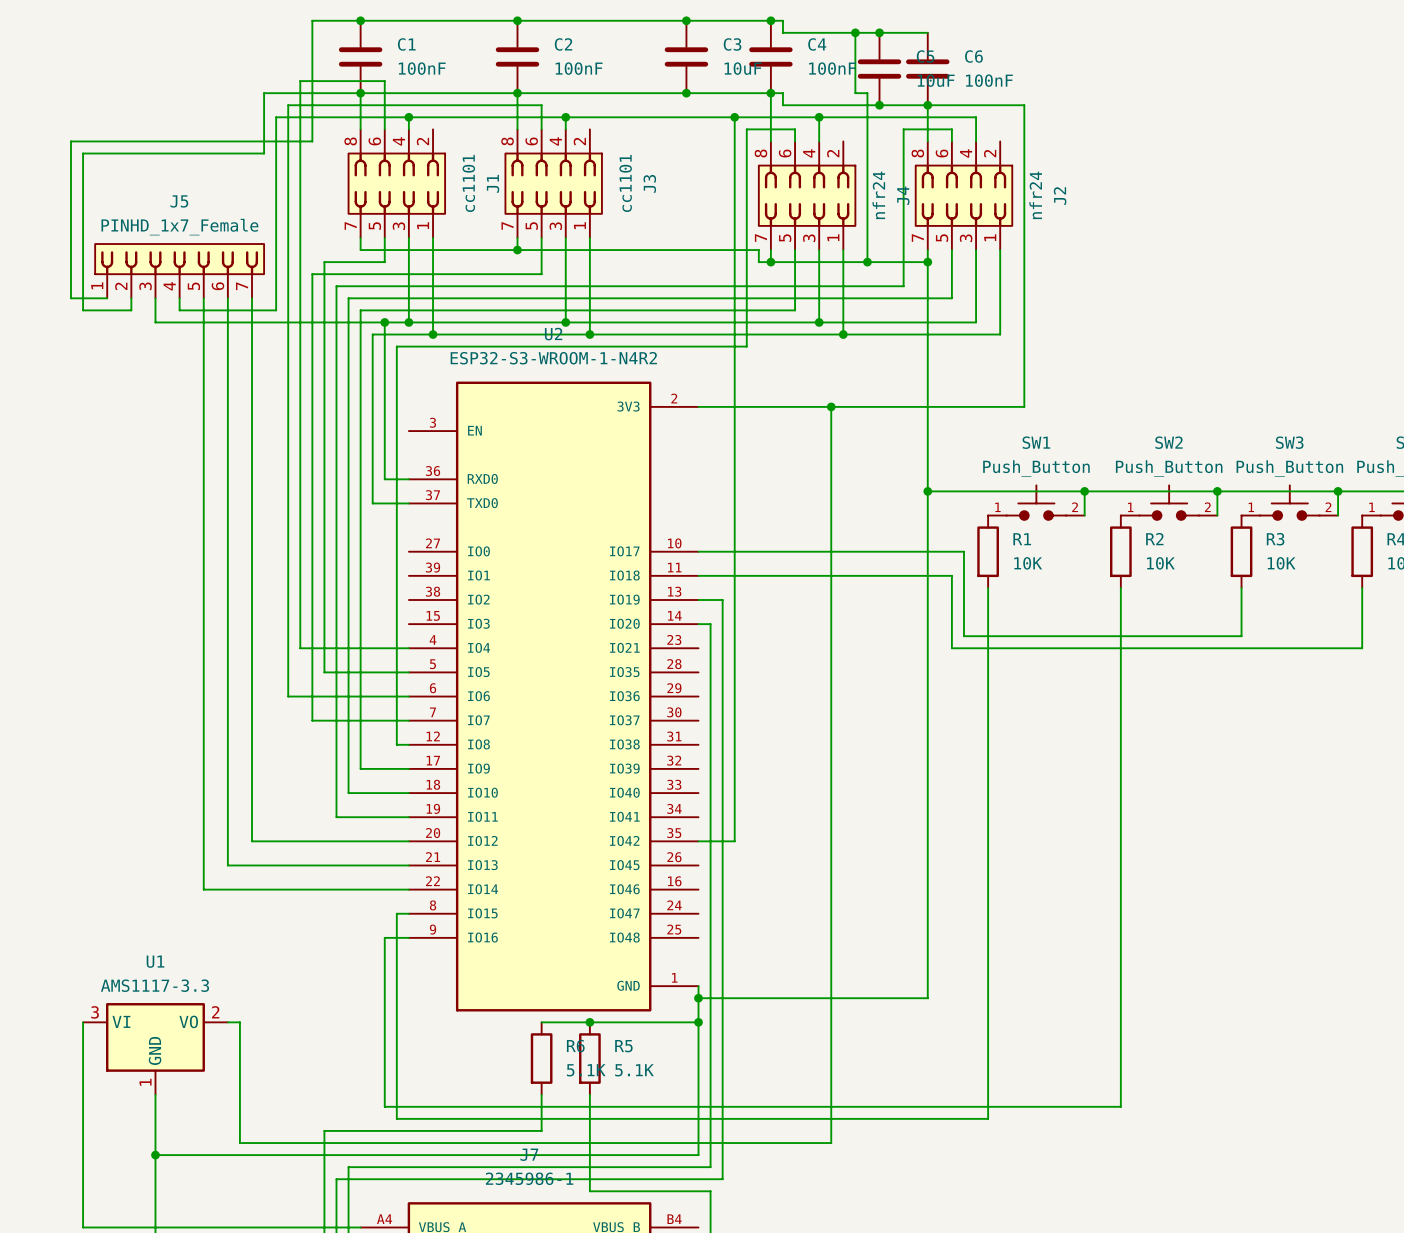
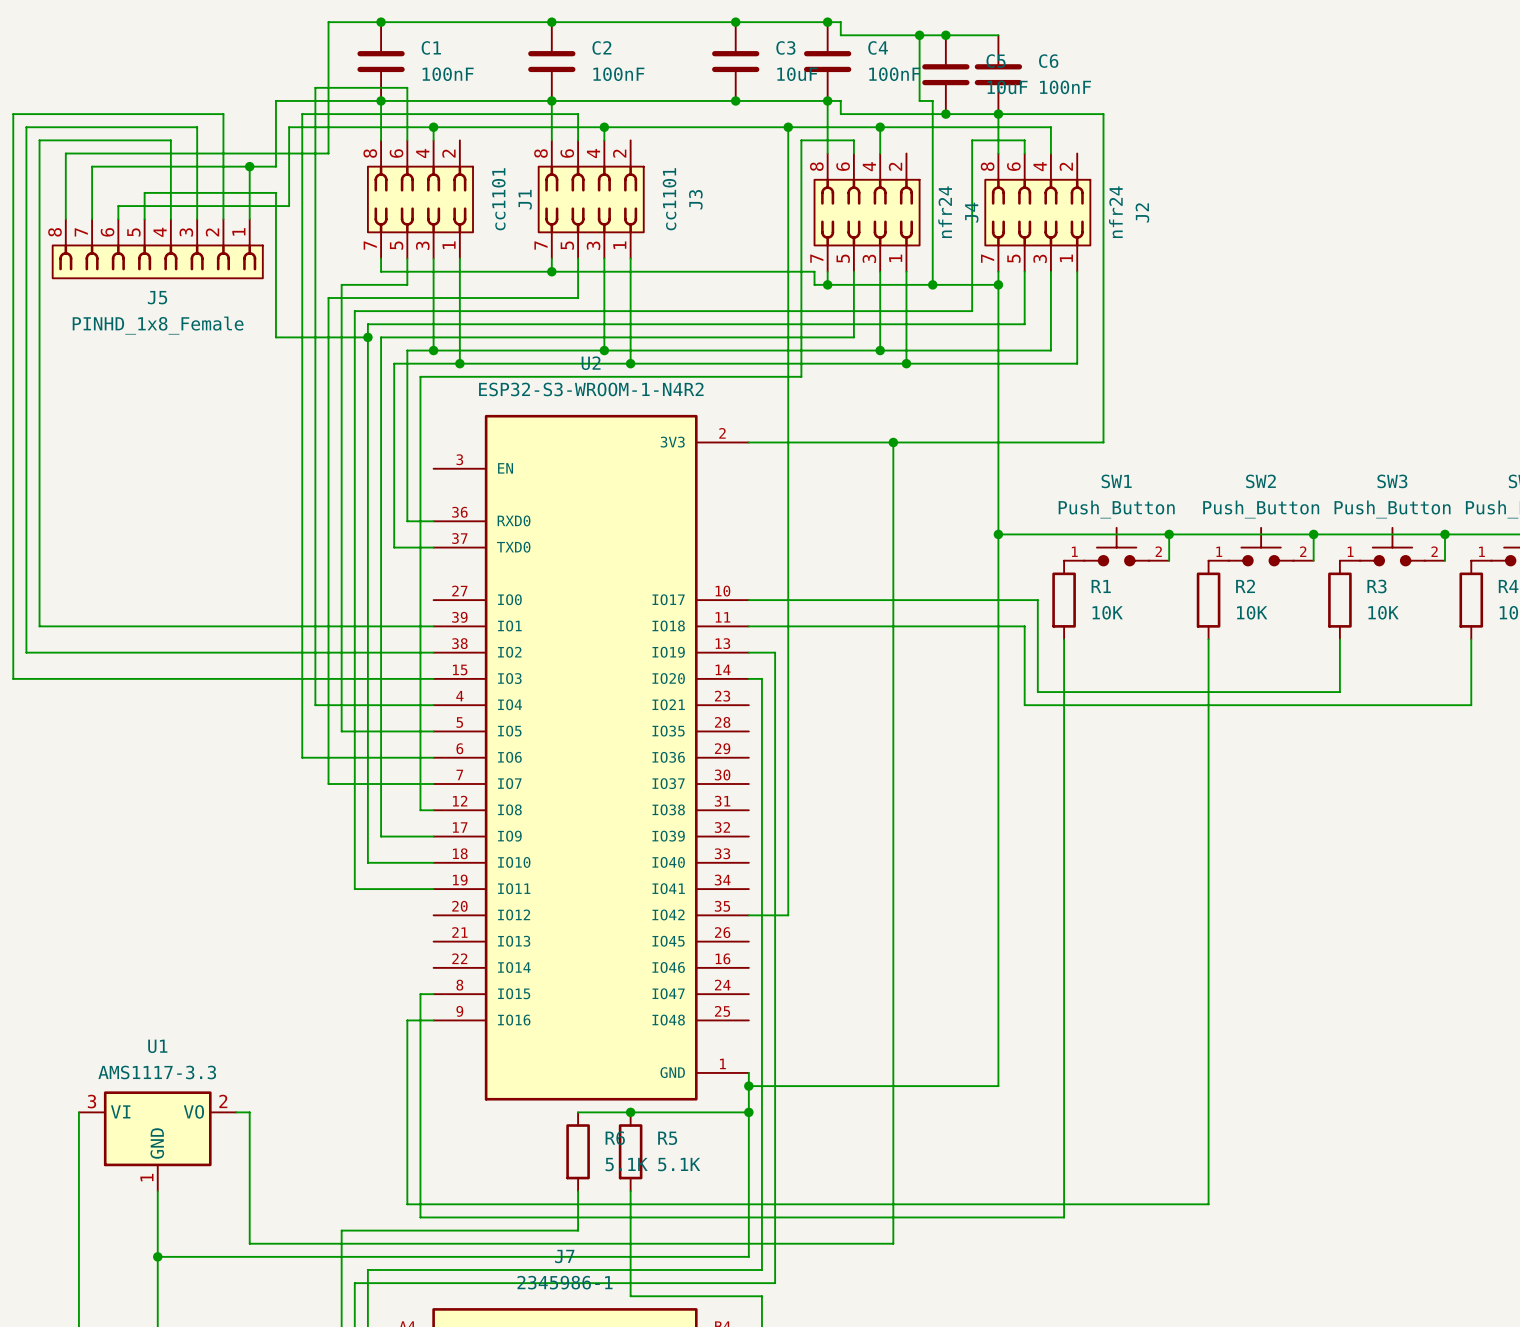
wire: (95, 153) (83, 153) (83, 310) (131, 310) (131, 298) -> (92, 166) (92, 219)
wire: none -> (249, 166) (249, 219)
junction: none -> (249, 166)
wire: (276, 189) (276, 310) -> (367, 337) (289, 337)
wire: none -> (289, 206) (118, 206) (118, 219)
wire: (71, 201) (71, 298) (107, 298) -> none
wire: none -> (170, 219) (170, 140) (39, 140) (39, 626) (433, 626)
J5 name position: J5 (179, 201) -> J5 (157, 297)
wire: none -> (197, 219) (197, 127) (26, 127) (26, 652) (433, 652)
wire: none -> (223, 219) (223, 114) (13, 114) (13, 678) (433, 678)
J5 value: PINHD_1x7_Female (179, 227) -> PINHD_1x8_Female (158, 325)
J5 symbol: [95, 244, 265, 299] -> [52, 219, 263, 279]
wire: (155, 298) (155, 322) (384, 322) -> none
wire: (179, 298) (179, 310) (264, 310) -> (144, 219) (144, 192) (275, 192) (275, 337)
wire: (203, 298) (203, 889) (408, 889) -> none
wire: (227, 298) (227, 865) (408, 865) -> none
wire: (252, 298) (252, 841) (408, 841) -> none
junction position: (384, 322) -> (367, 337)

